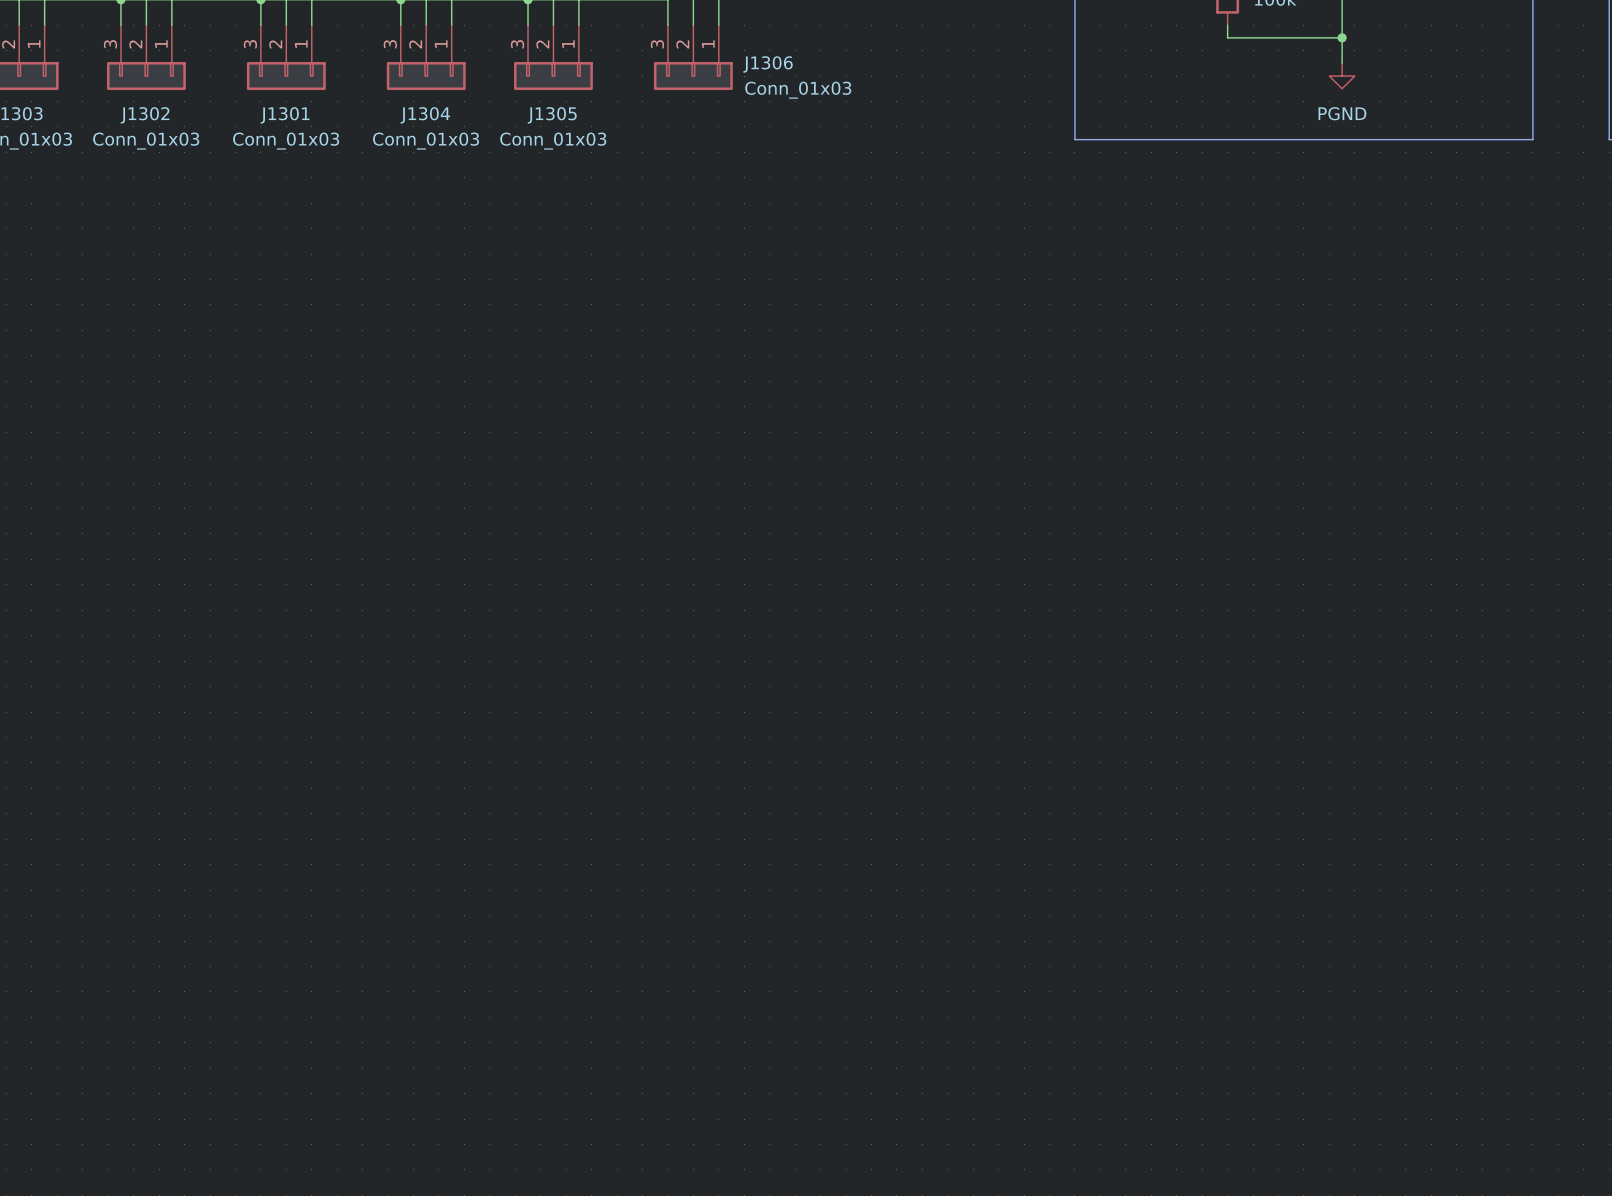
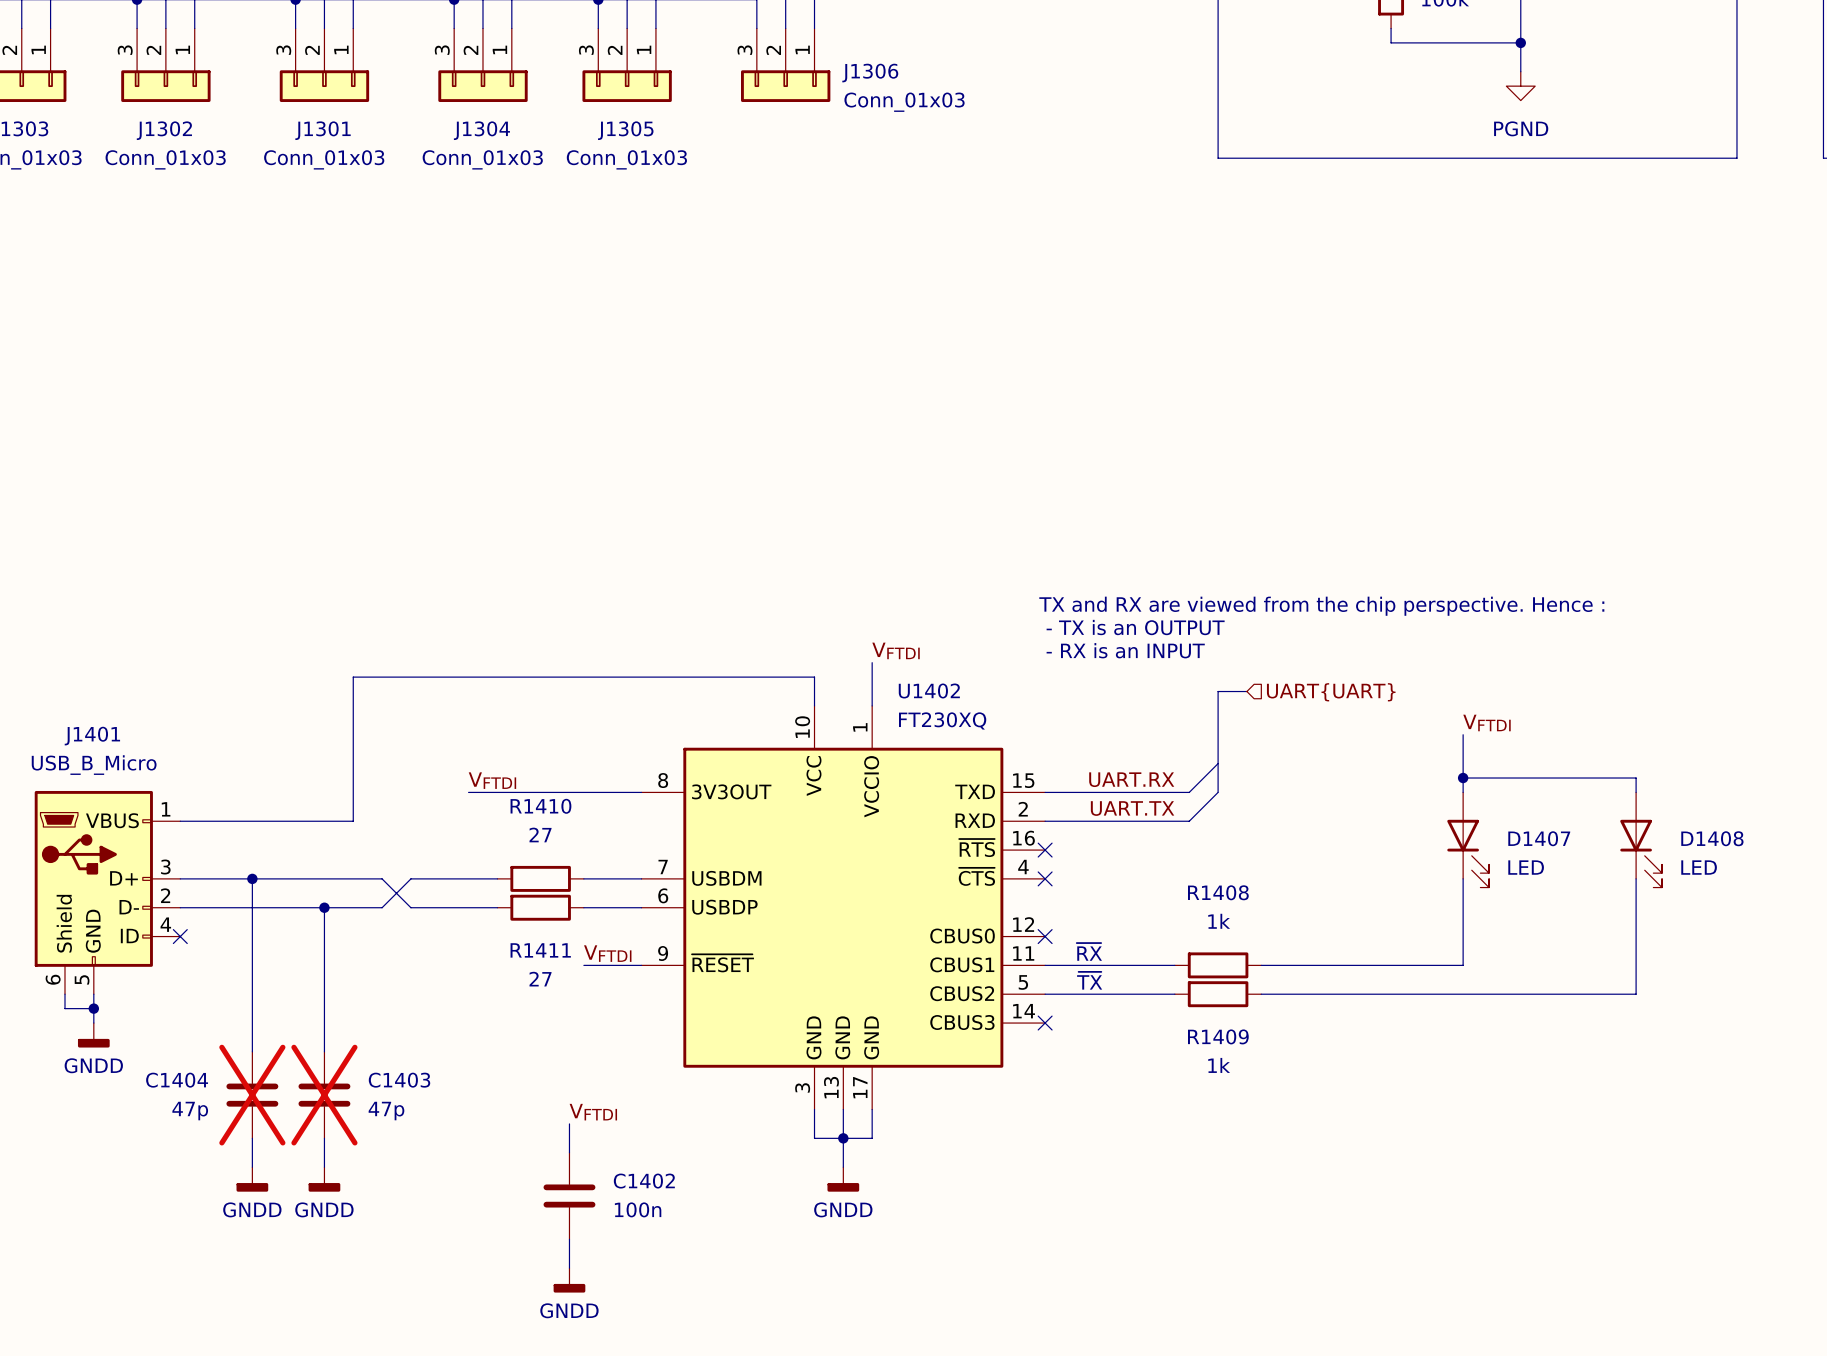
text: none -> TX and RX are viewed from the chip perspective. Hence : (1321, 606)
text: none -> - TX is an OUTPUT (1135, 627)
label: none -> VFTDI (896, 650)
text: none -> - RX is an INPUT (1125, 650)
wire: none -> (872, 662) (872, 705)
bus: none -> (1246, 691) (1218, 691) (1218, 792)
hierarchical label: none -> UART{UART} (1331, 692)
wire: none -> (814, 705) (814, 677) (353, 677) (353, 821) (180, 821)
label: none -> VFTDI (1486, 722)
wire: none -> (1463, 734) (1463, 792)
wire: none -> (1218, 763) (1189, 792) (1045, 792)
wire: none -> (1463, 778) (1636, 778) (1636, 792)
junction: none -> (1463, 778)
label: none -> VFTDI (492, 780)
label: none -> UART.RX (1131, 779)
wire: none -> (468, 792) (641, 792)
wire: none -> (1218, 792) (1189, 821) (1045, 821)
label: none -> UART.TX (1132, 808)
D1407: none -> LED (1468, 839)
D1408: none -> LED (1641, 839)
no-connect mark: none -> (1045, 850)
wire: none -> (180, 878) (382, 878) (410, 907) (497, 907)
wire: none -> (252, 878) (252, 1051)
junction: none -> (252, 878)
wire: none -> (497, 878) (410, 878) (382, 907) (180, 907)
R1410: none -> 27 (540, 878)
wire: none -> (583, 878) (641, 878)
no-connect mark: none -> (1045, 878)
wire: none -> (1463, 878) (1463, 965) (1261, 965)
wire: none -> (1636, 878) (1636, 994) (1261, 994)
J1401: none -> USB_B_Micro (107, 892)
wire: none -> (324, 907) (324, 1051)
junction: none -> (324, 907)
R1411: none -> 27 (540, 907)
wire: none -> (583, 907) (641, 907)
U1402: none -> FT230XQ (843, 907)
no-connect mark: none -> (180, 936)
no-connect mark: none -> (1045, 936)
text: none -> ~{RX} (1089, 951)
label: none -> VFTDI (607, 953)
wire: none -> (583, 965) (641, 965)
wire: none -> (1045, 965) (1174, 965)
R1408: none -> 1k (1218, 965)
text: none -> ~{TX} (1089, 980)
wire: none -> (64, 994) (64, 1008) (93, 1008)
wire: none -> (93, 994) (93, 1023)
wire: none -> (1045, 994) (1174, 994)
R1409: none -> 1k (1218, 994)
junction: none -> (93, 1008)
no-connect mark: none -> (1045, 1023)
power symbol: none -> GNDD (93, 1035)
C1404: none -> 47p (252, 1095)
C1403: none -> 47p (324, 1095)
wire: none -> (814, 1109) (814, 1138) (872, 1138) (872, 1109)
wire: none -> (843, 1109) (843, 1167)
label: none -> VFTDI (593, 1112)
wire: none -> (569, 1123) (569, 1152)
wire: none -> (252, 1138) (252, 1167)
wire: none -> (324, 1138) (324, 1167)
junction: none -> (843, 1138)
power symbol: none -> GNDD (252, 1179)
power symbol: none -> GNDD (324, 1179)
power symbol: none -> GNDD (843, 1179)
C1402: none -> 100n (569, 1196)
wire: none -> (569, 1239) (569, 1268)
power symbol: none -> GNDD (569, 1280)

